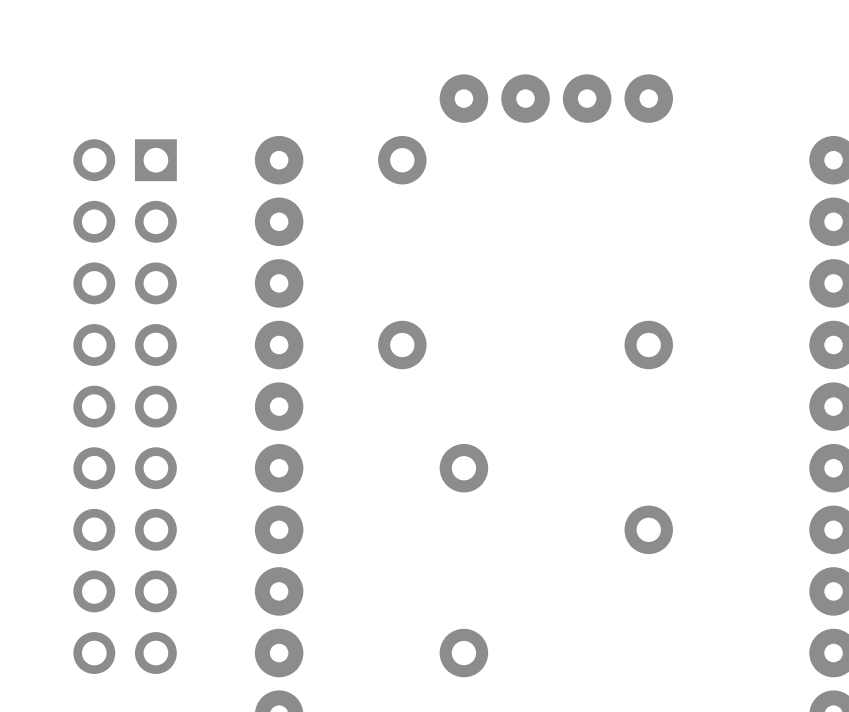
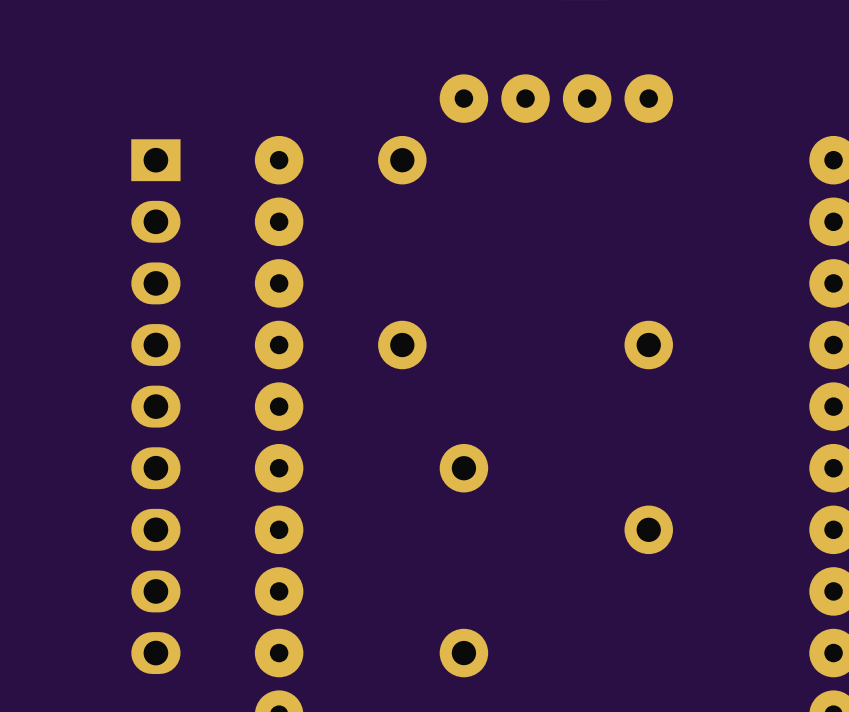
part: (125, 406) -> none
part: none -> (155, 406)

